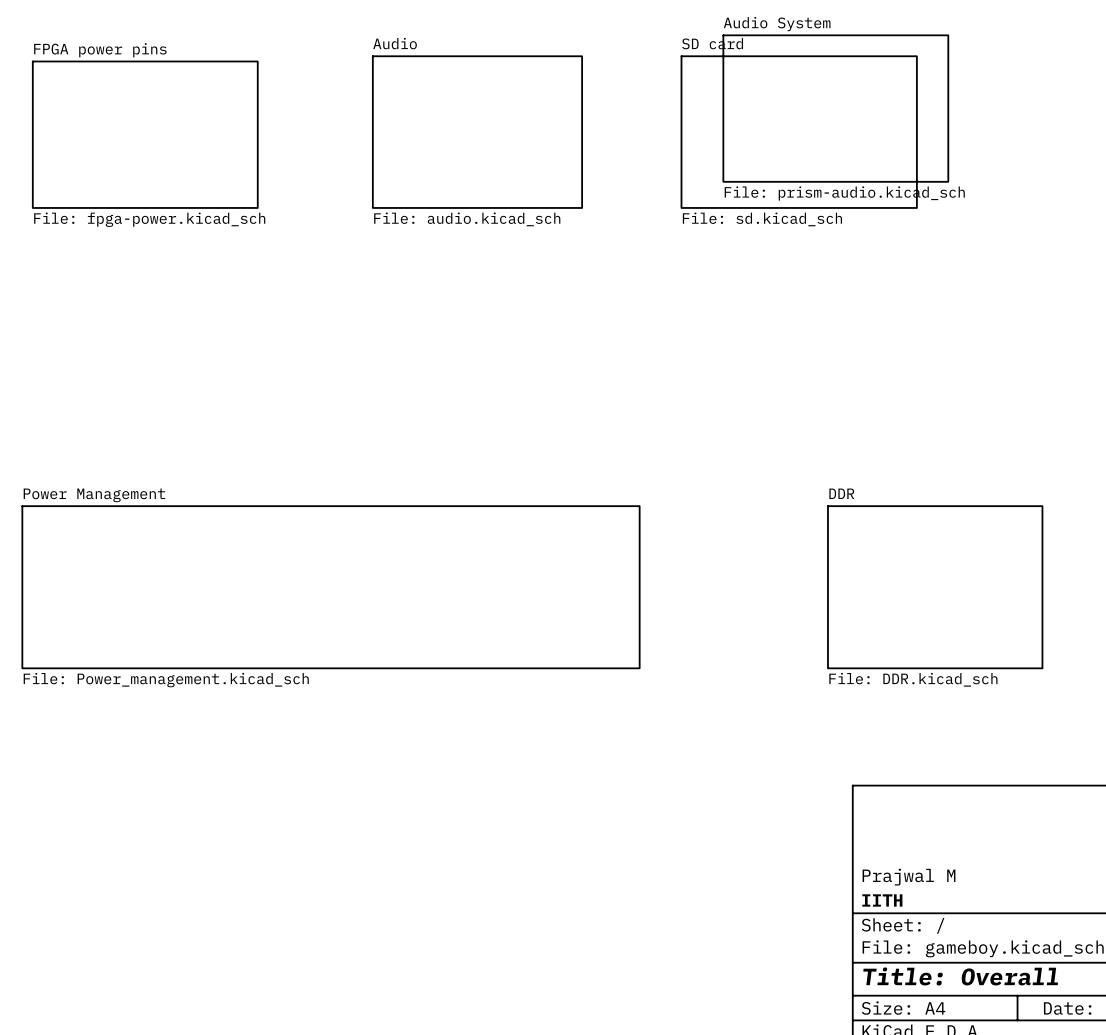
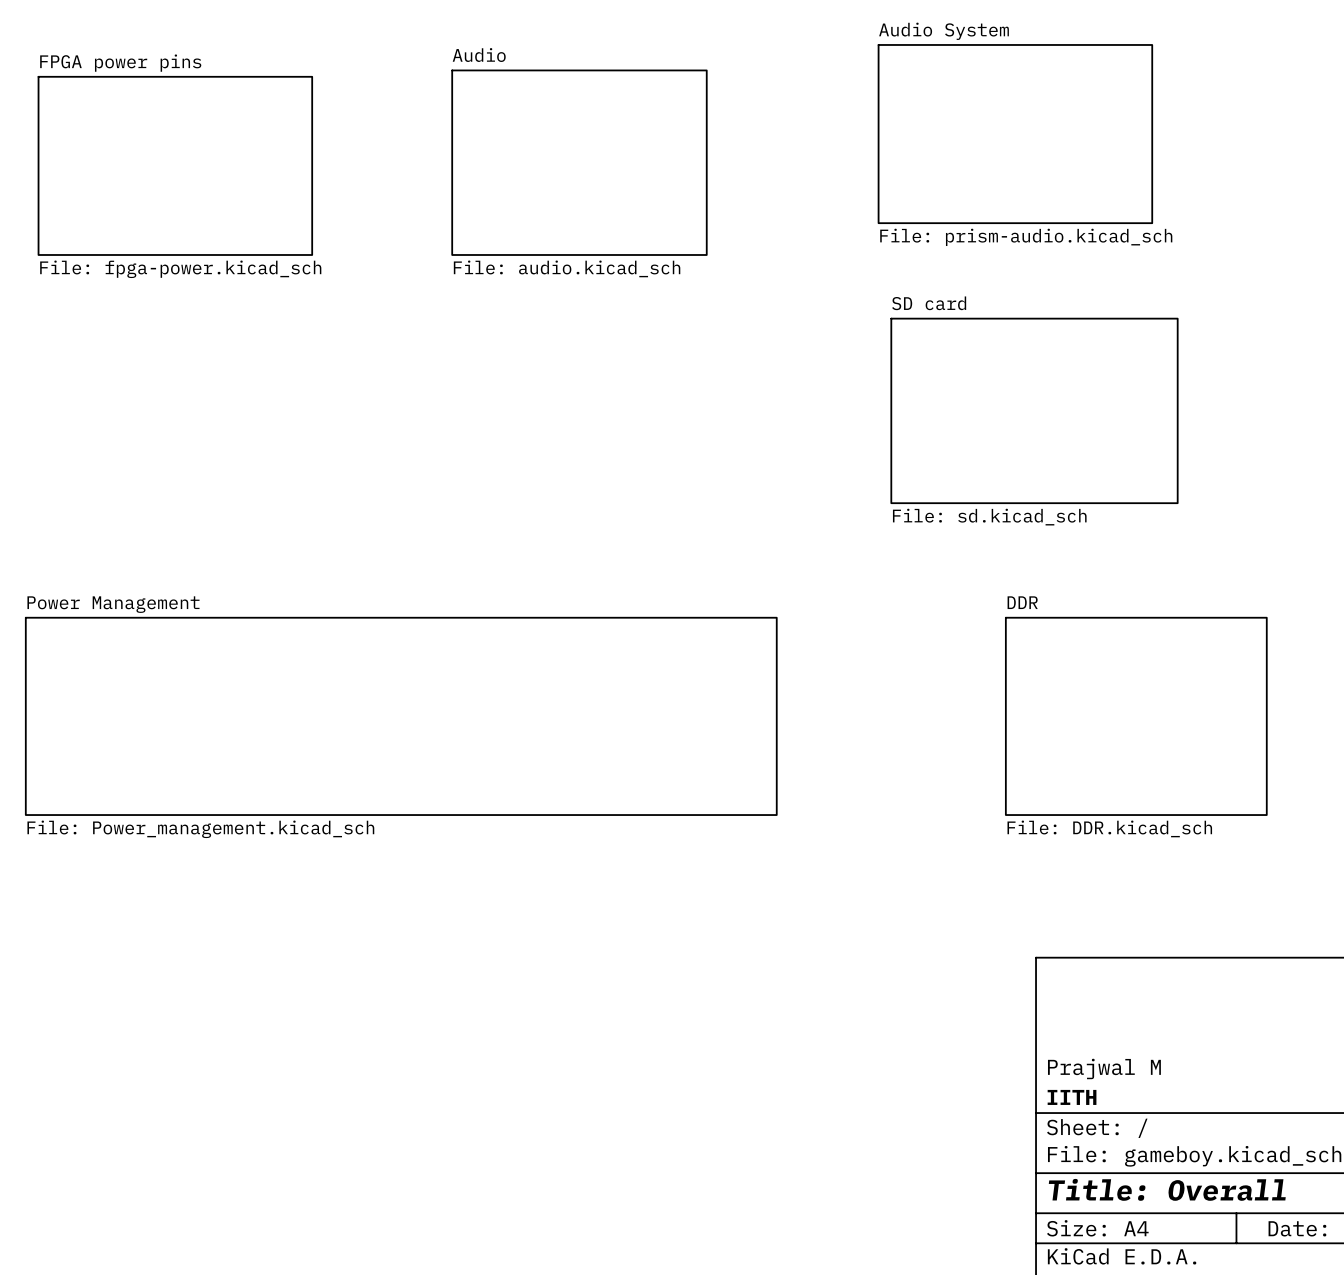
sheet SD card: File: sd.kicad_sch (799, 132) -> none
sheet SD card: none -> File: sd.kicad_sch (1034, 410)

